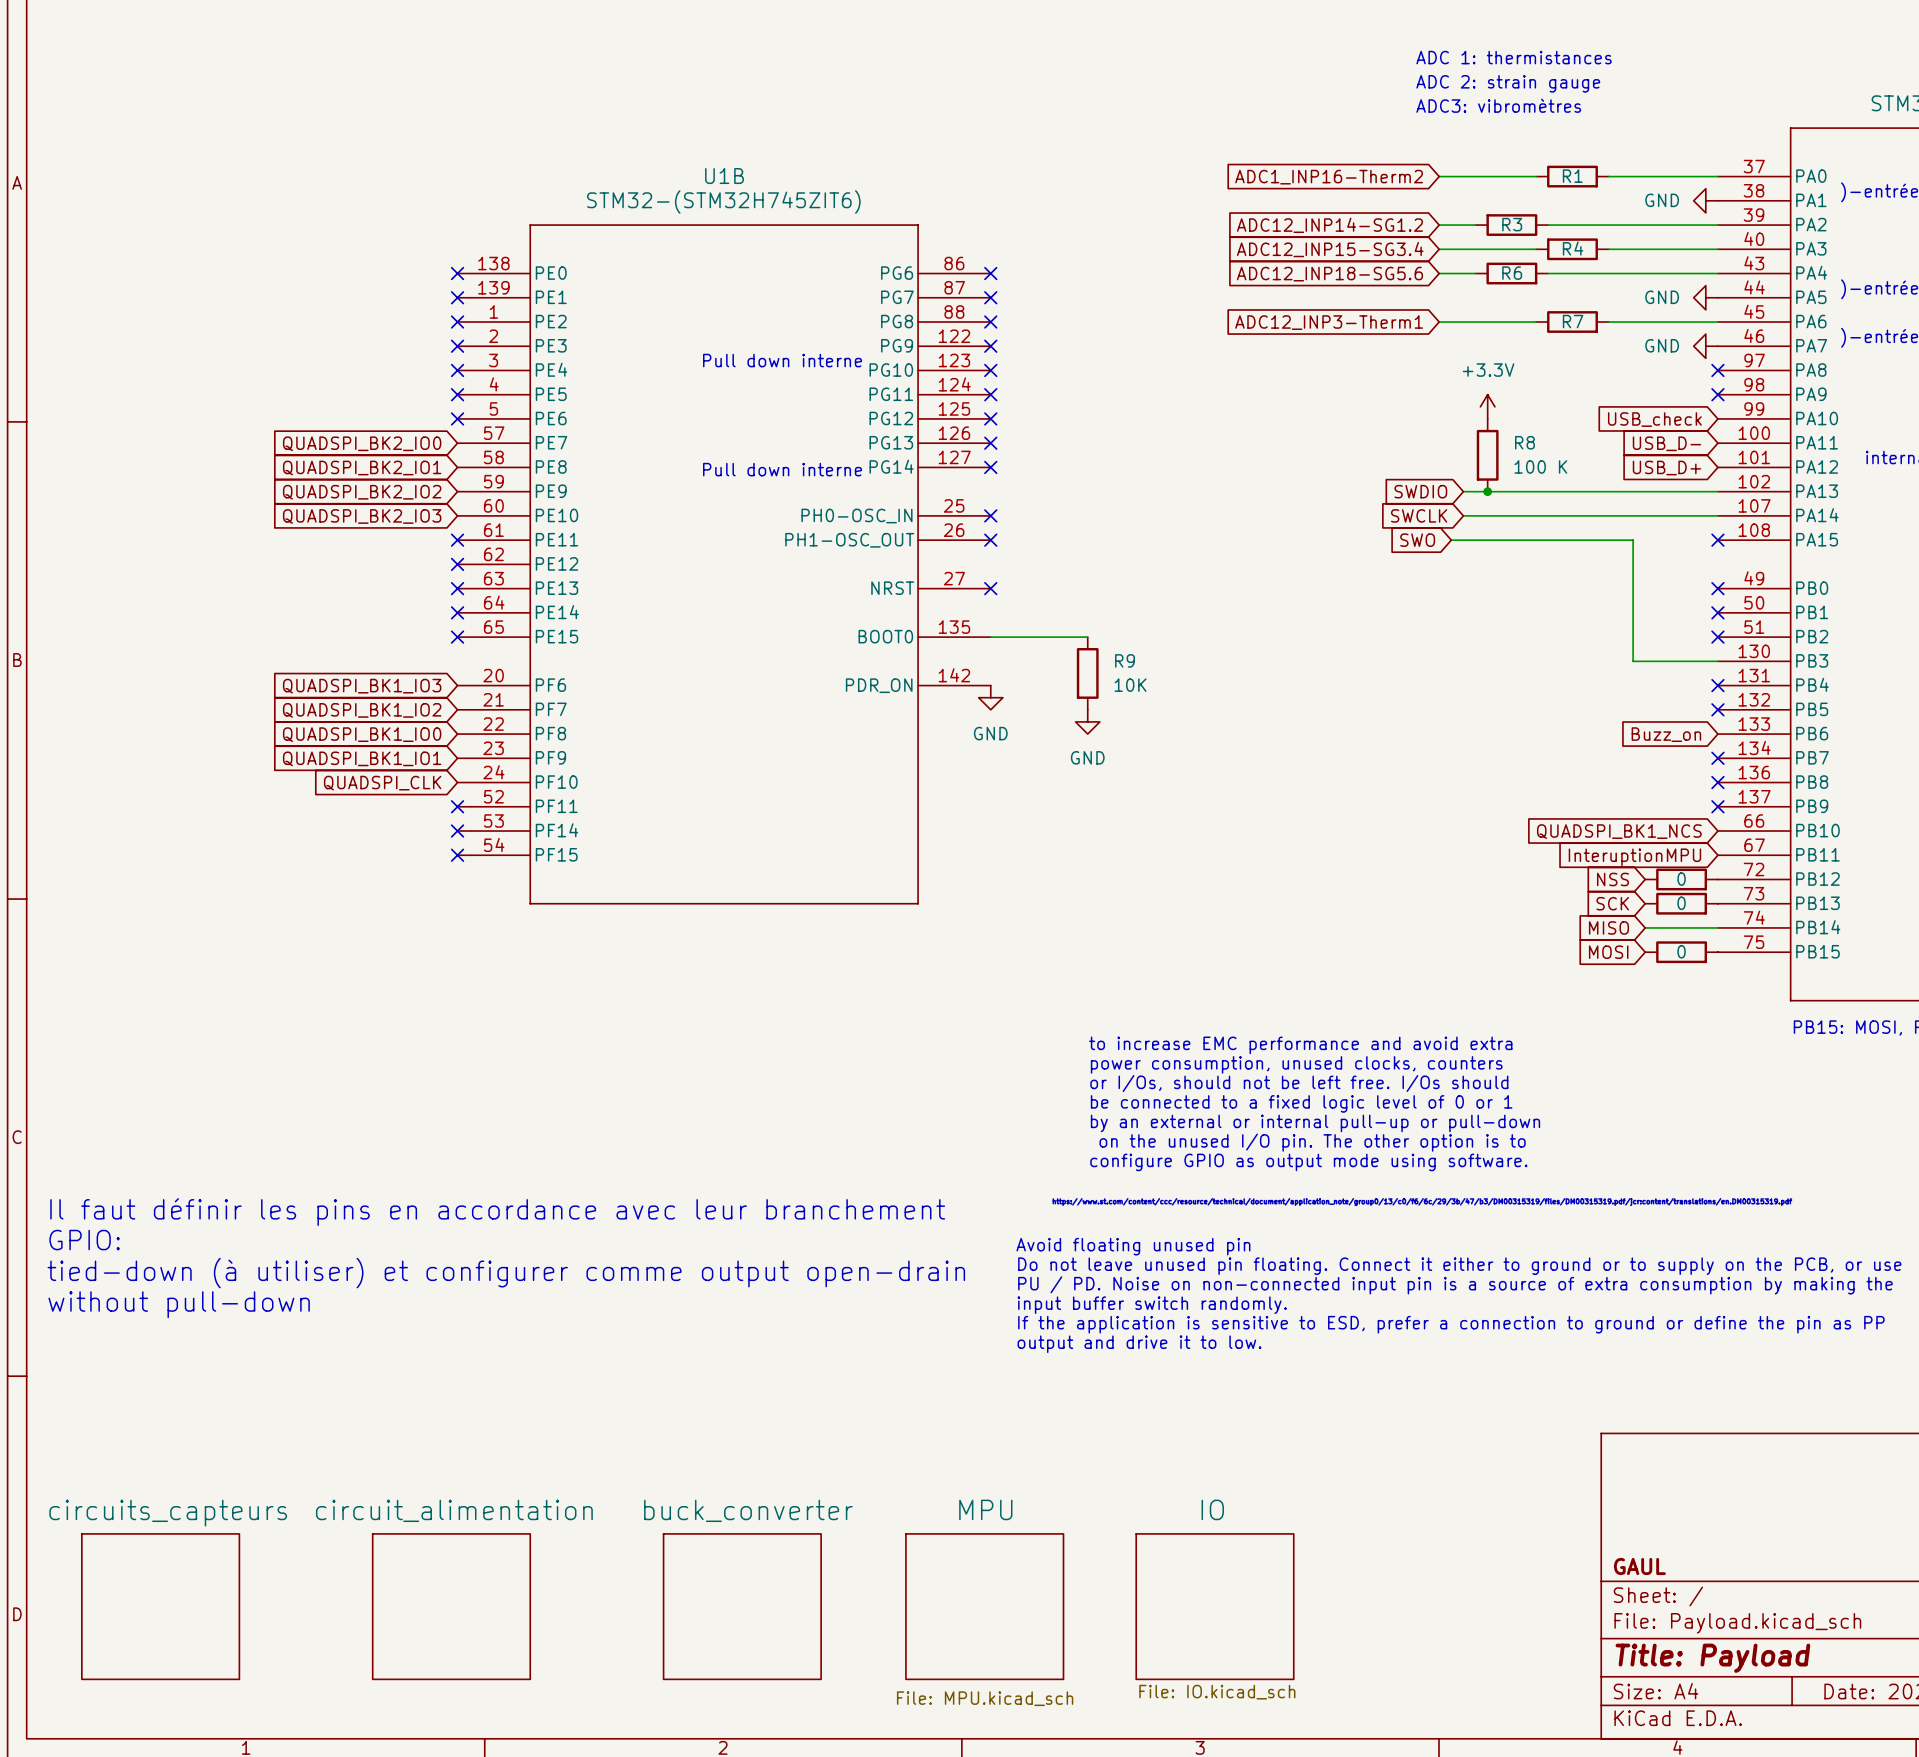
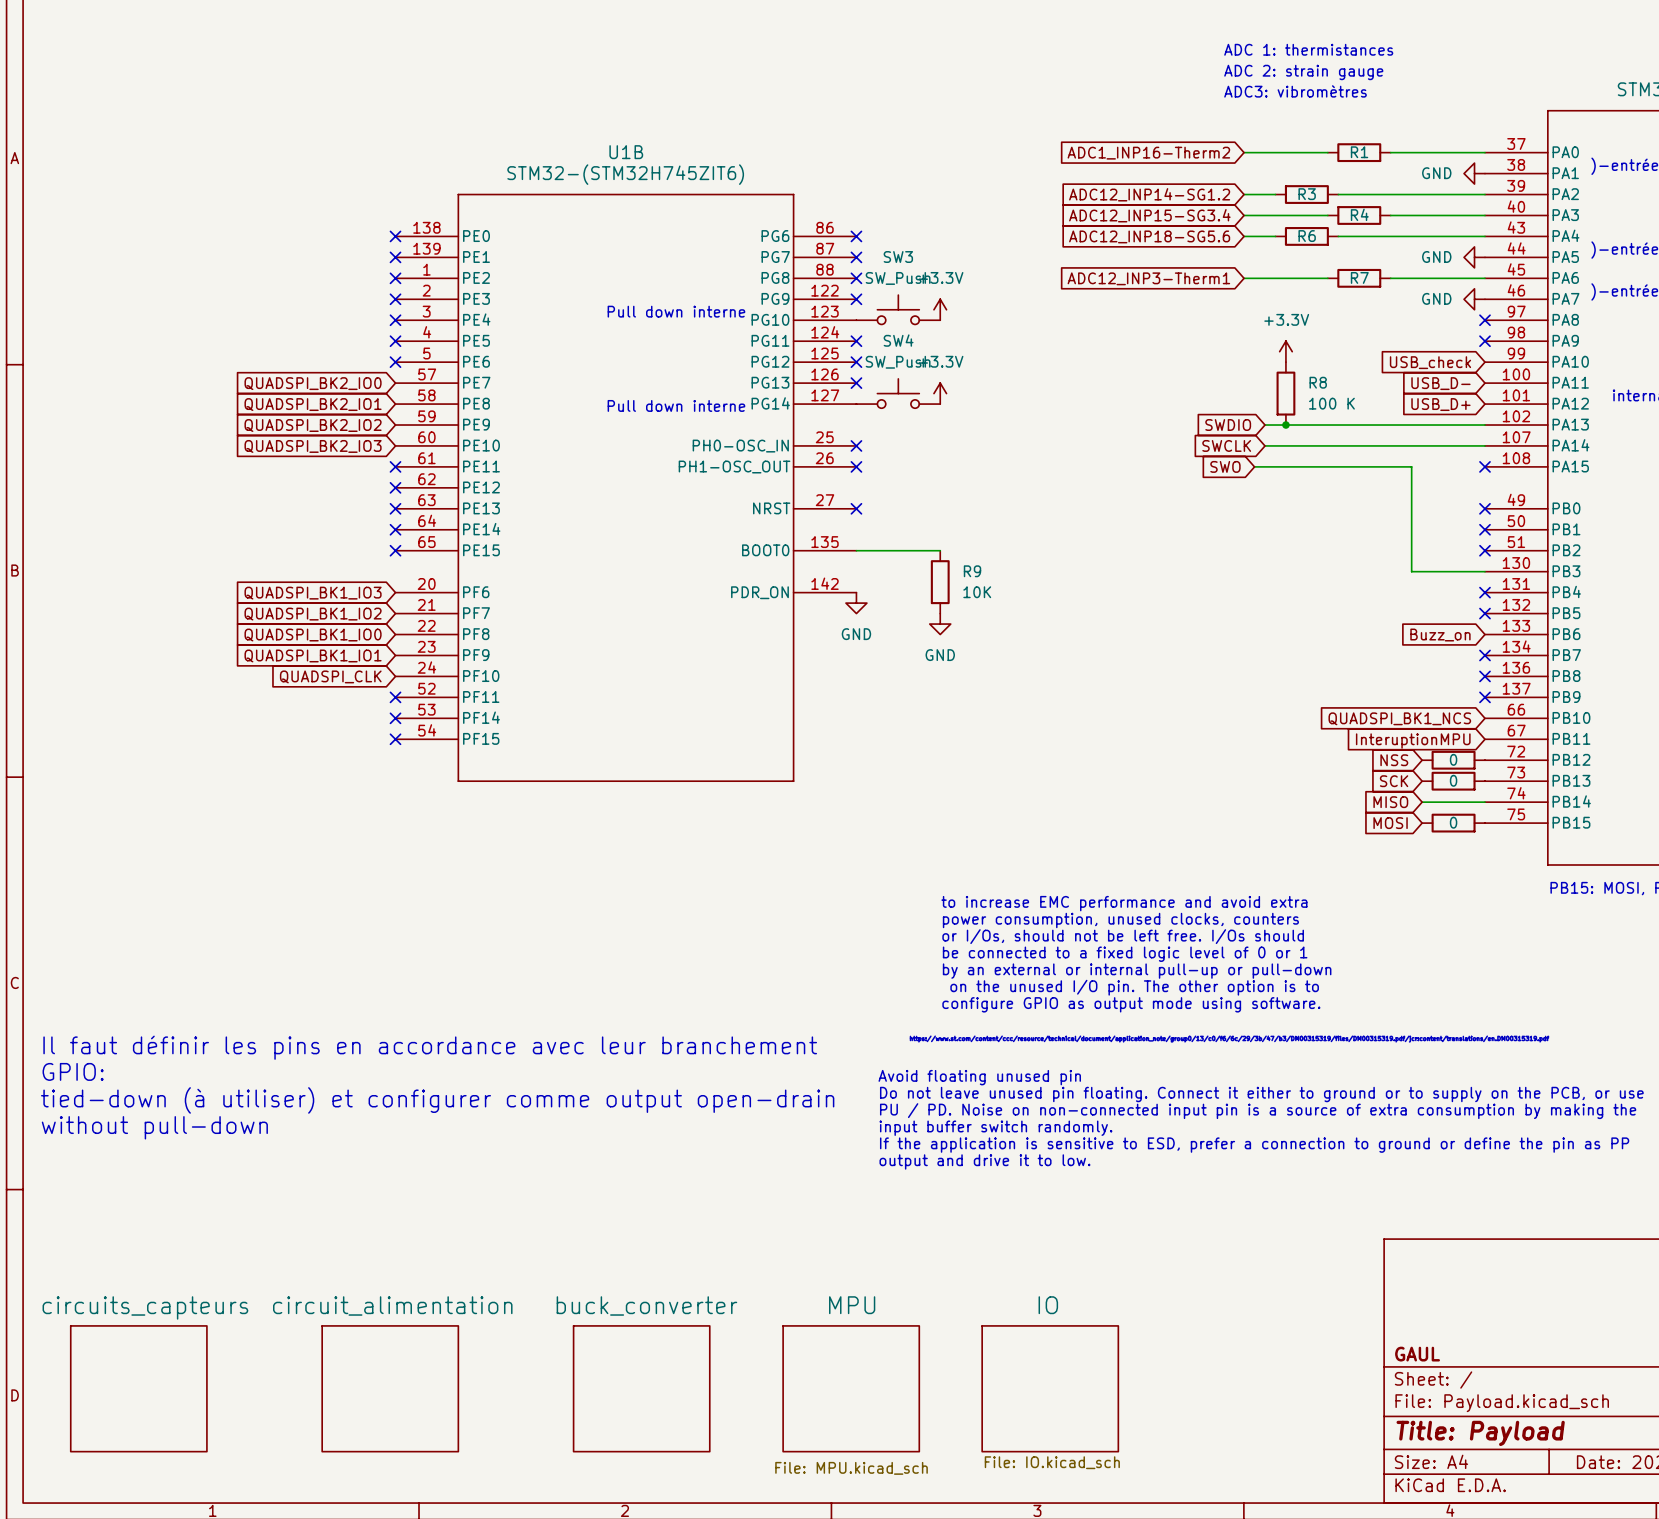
SW3: none -> SW_Push (898, 309)
power symbol: none -> +3.3V (940, 309)
no-connect mark: (990, 370) -> none
SW4: none -> SW_Push (898, 393)
power symbol: none -> +3.3V (940, 393)
no-connect mark: (990, 467) -> none

